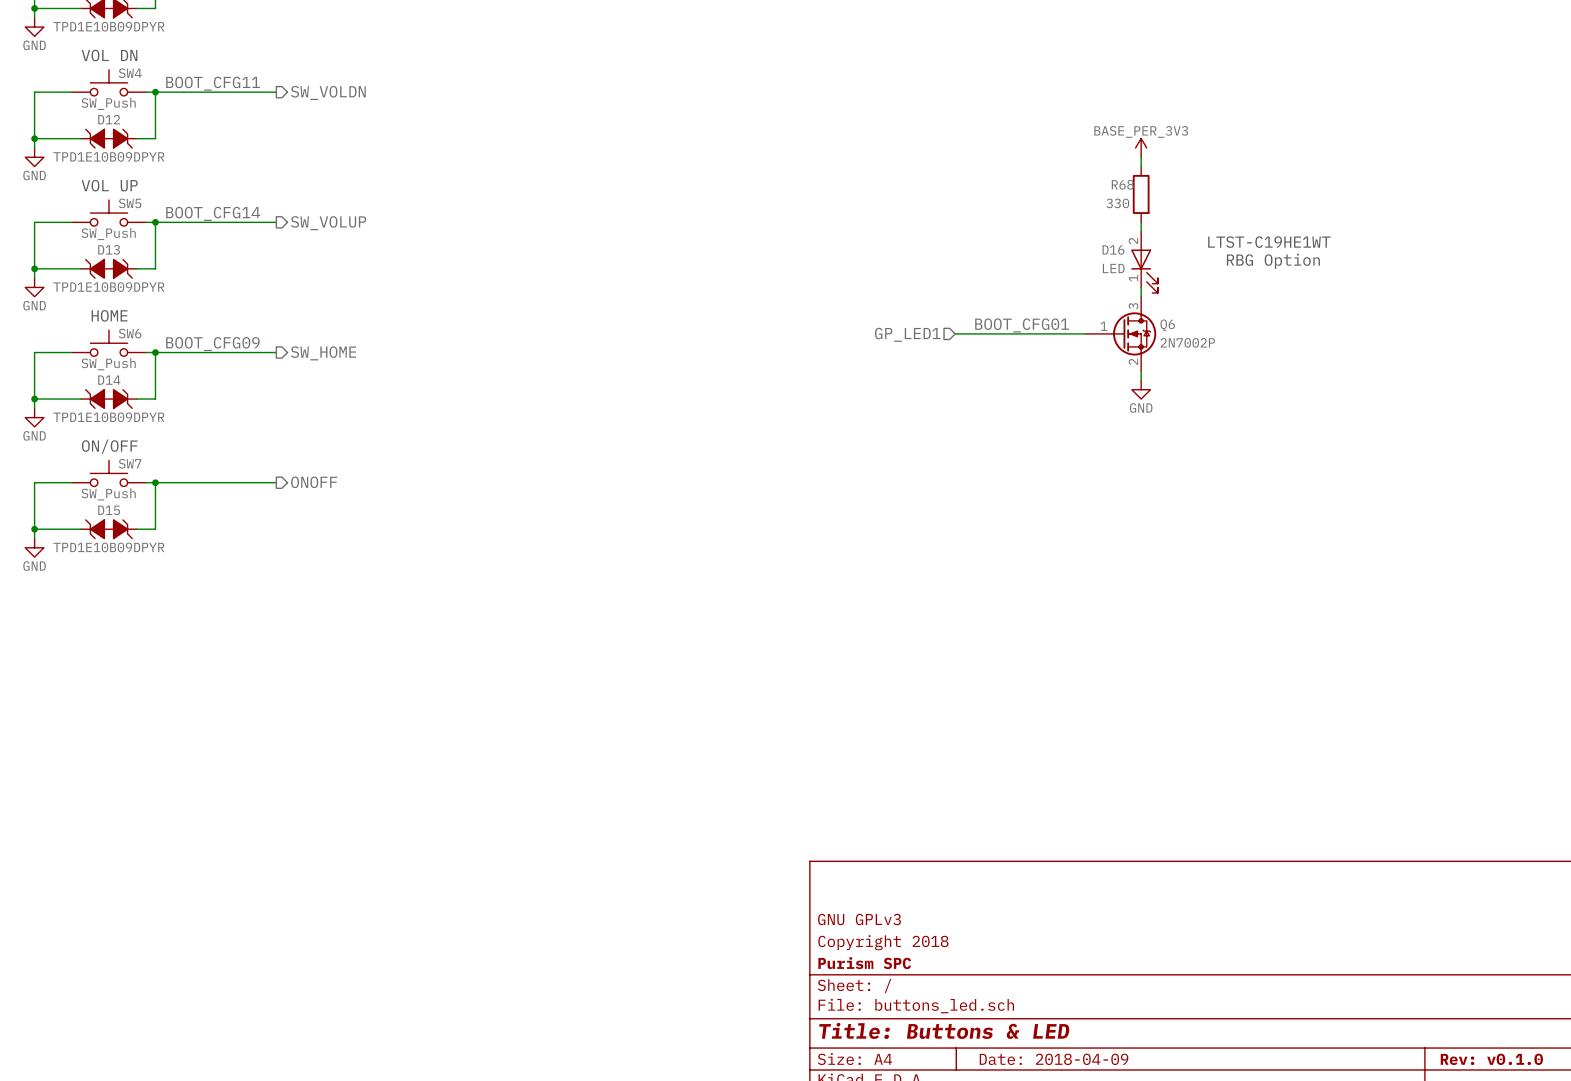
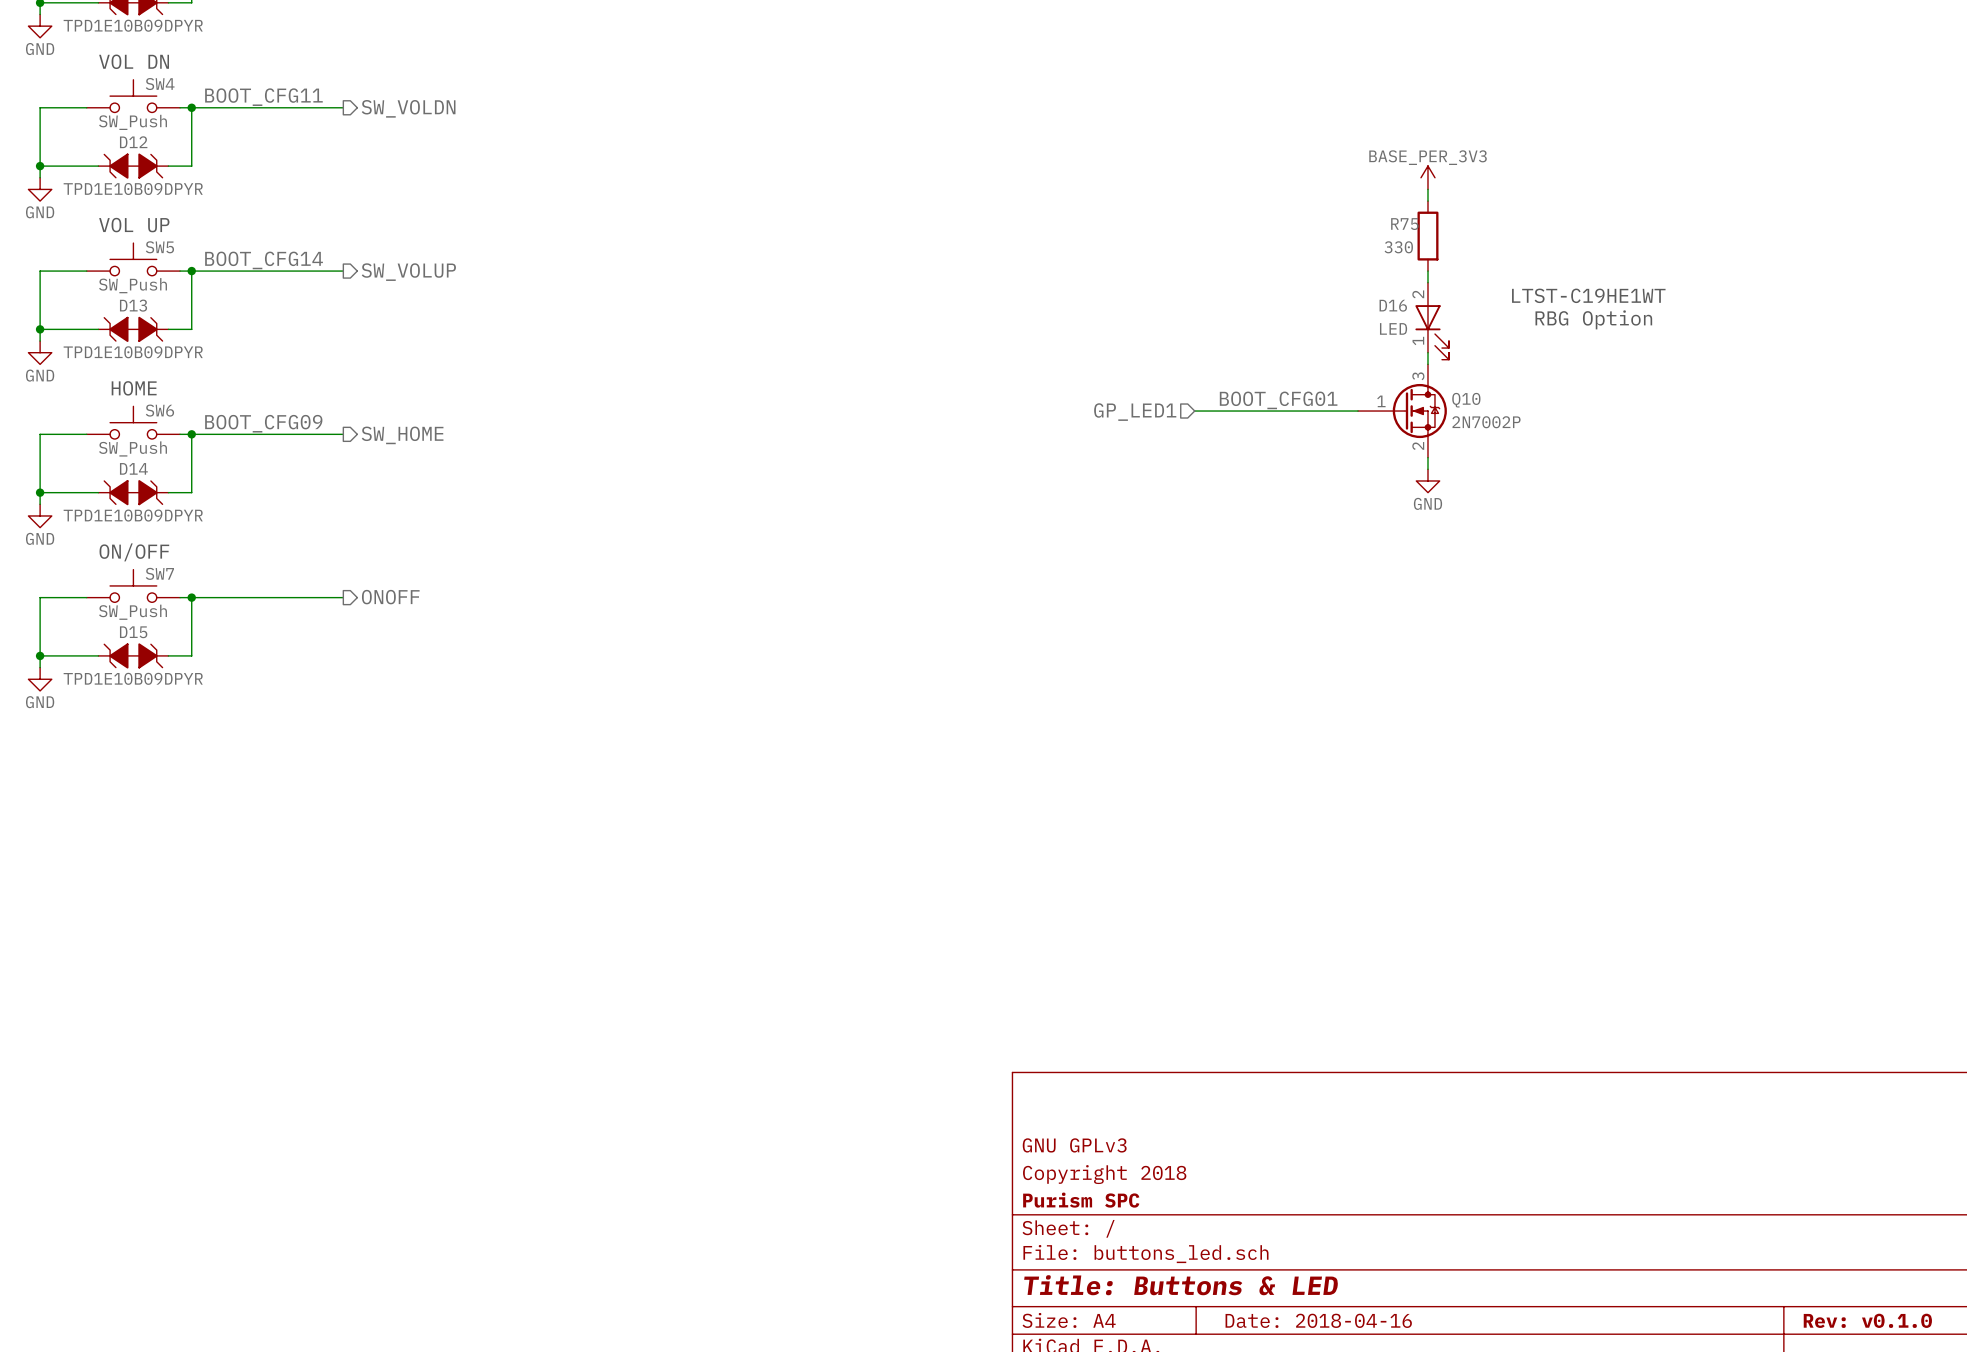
R68 name: R68 (1122, 184) -> R75 (1404, 224)
Q6 name: Q6 (1167, 325) -> Q10 (1466, 400)
title block: Date: 2018-04-09 (1054, 1059) -> Date: 2018-04-16 (1318, 1320)

